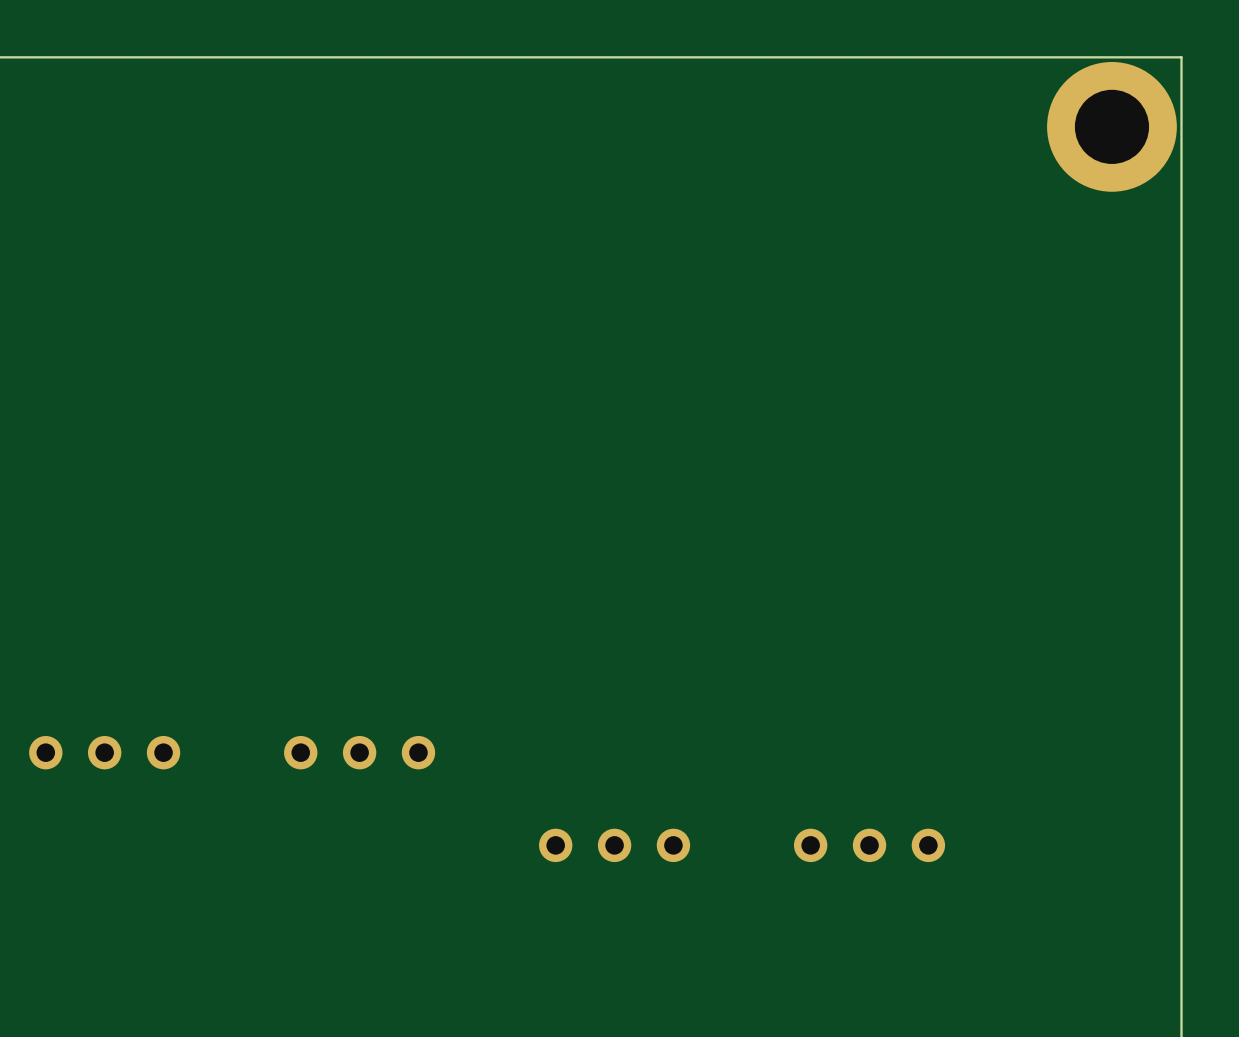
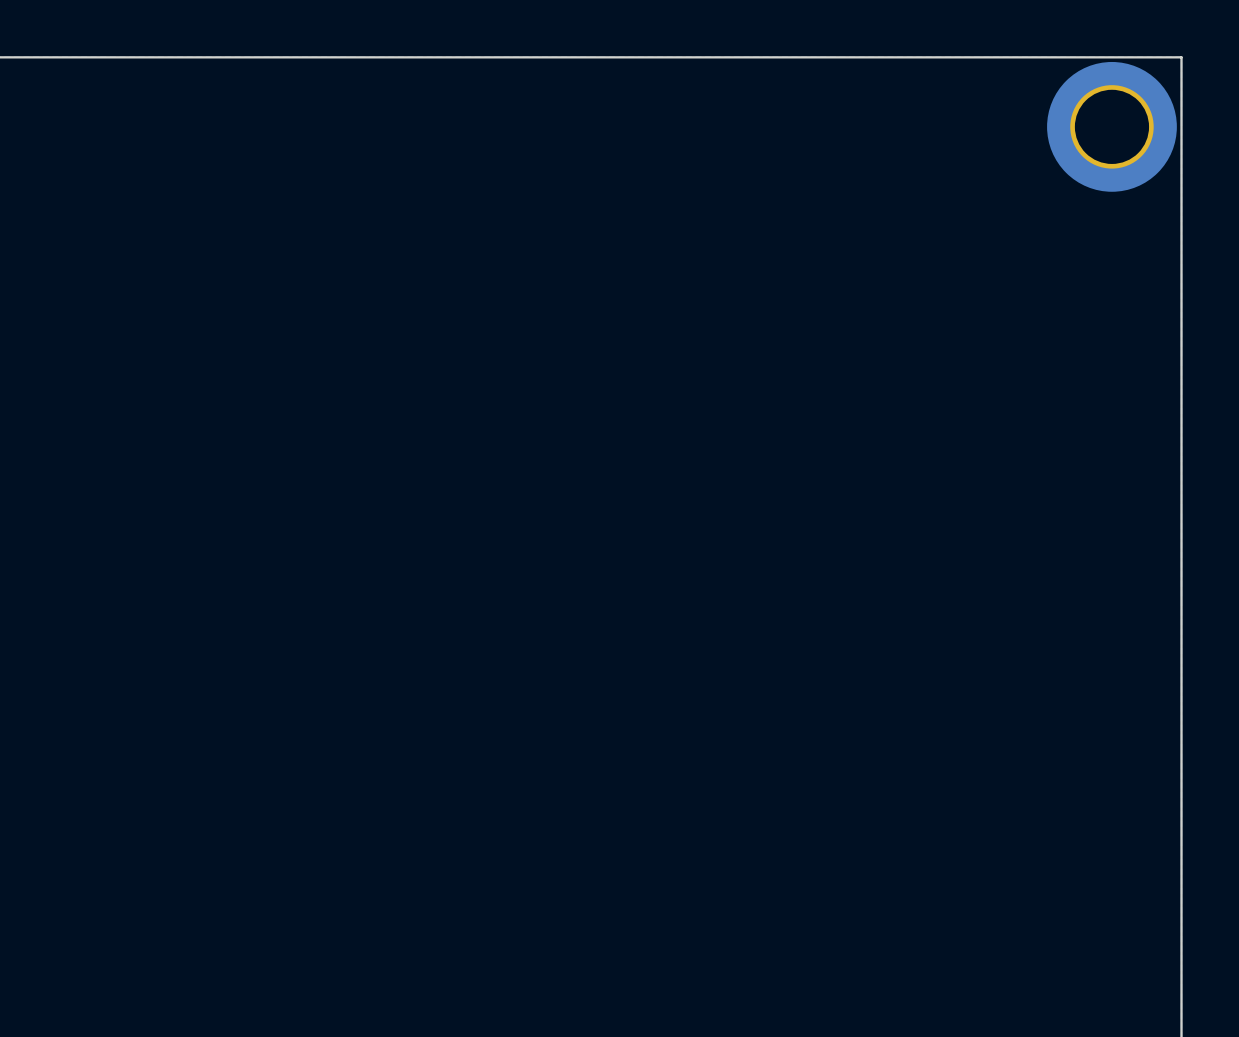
part: (104, 752) -> none
part: (359, 752) -> none
part: (614, 845) -> none
part: (869, 845) -> none

